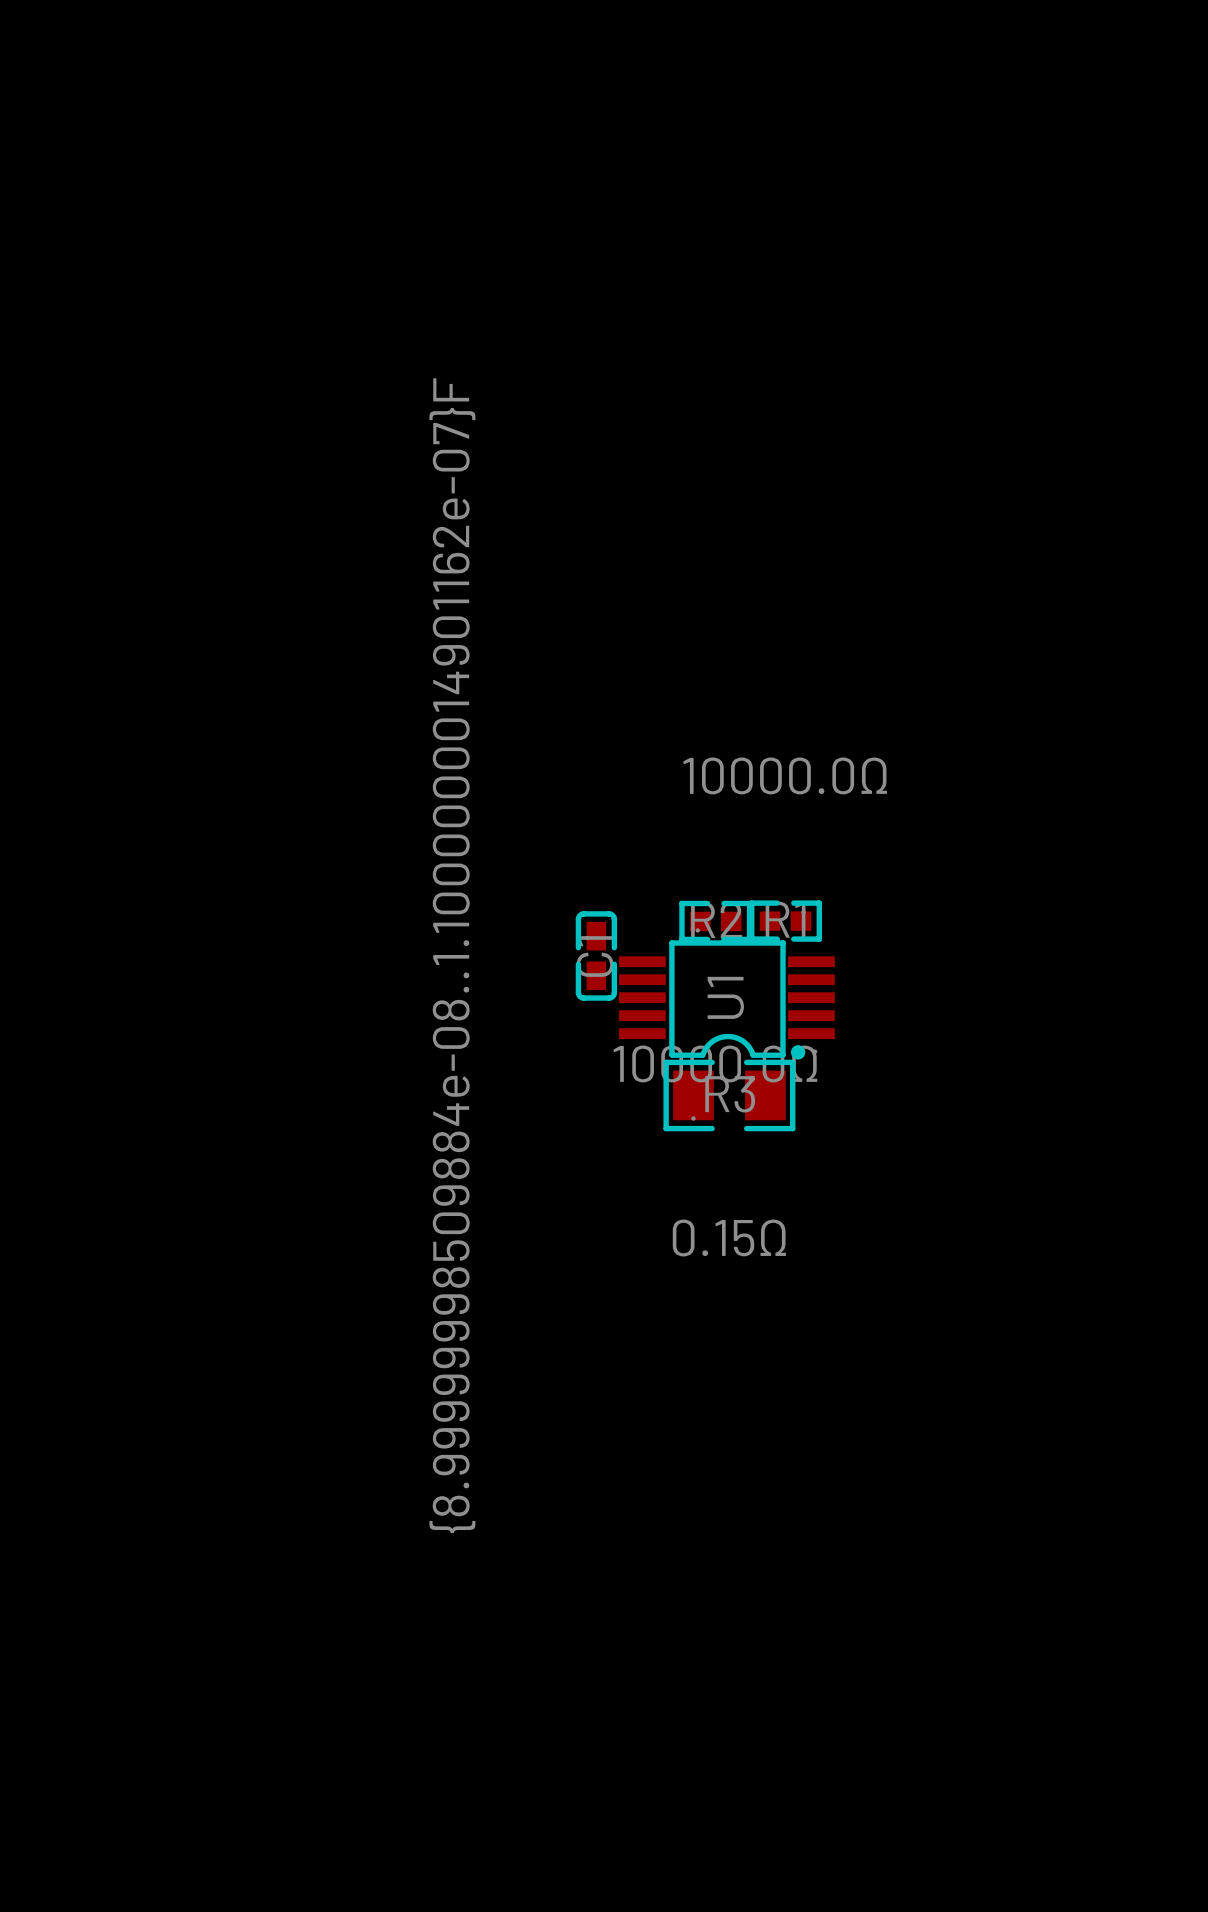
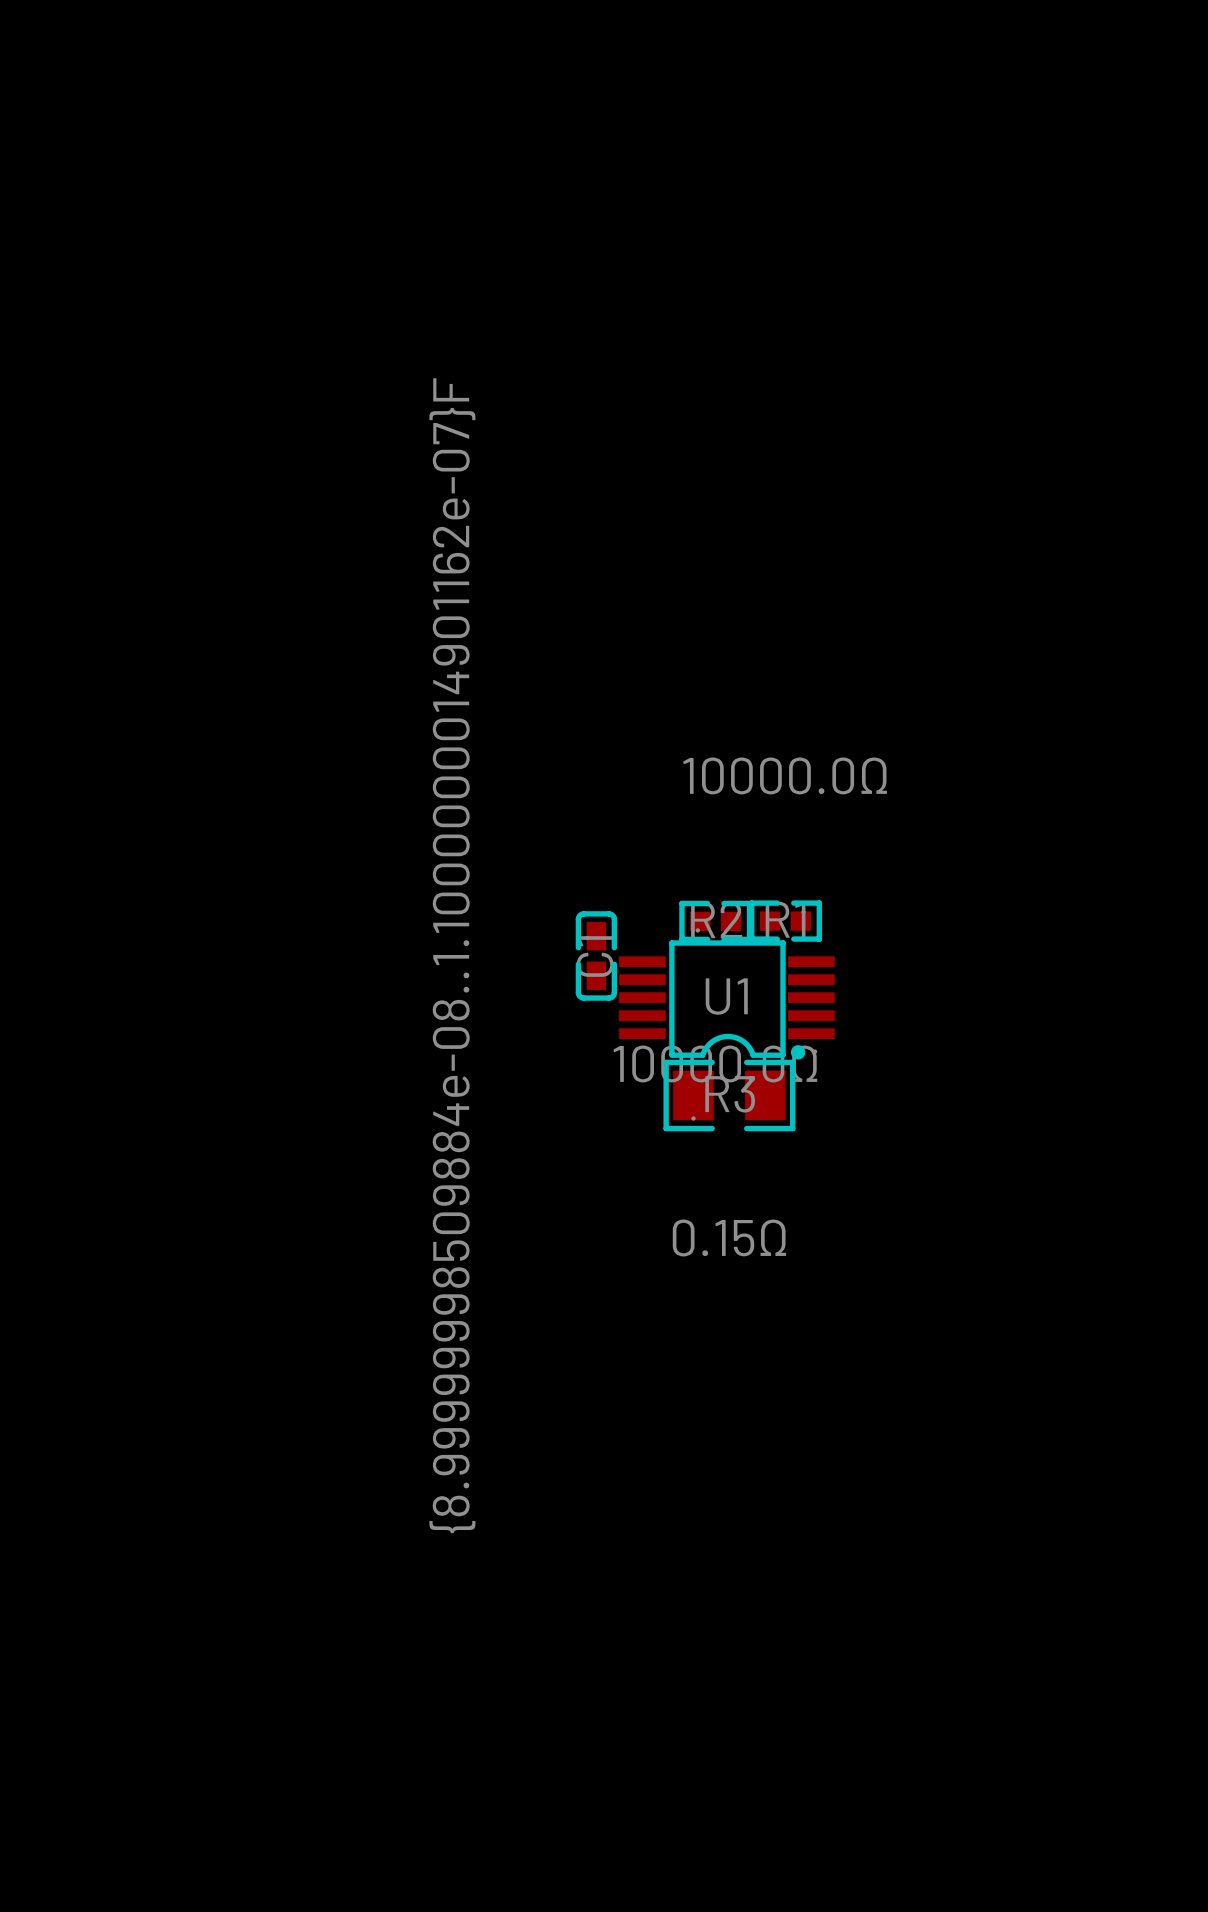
U1 name rotation: 0° (725, 997) -> 90° clockwise (726, 996)

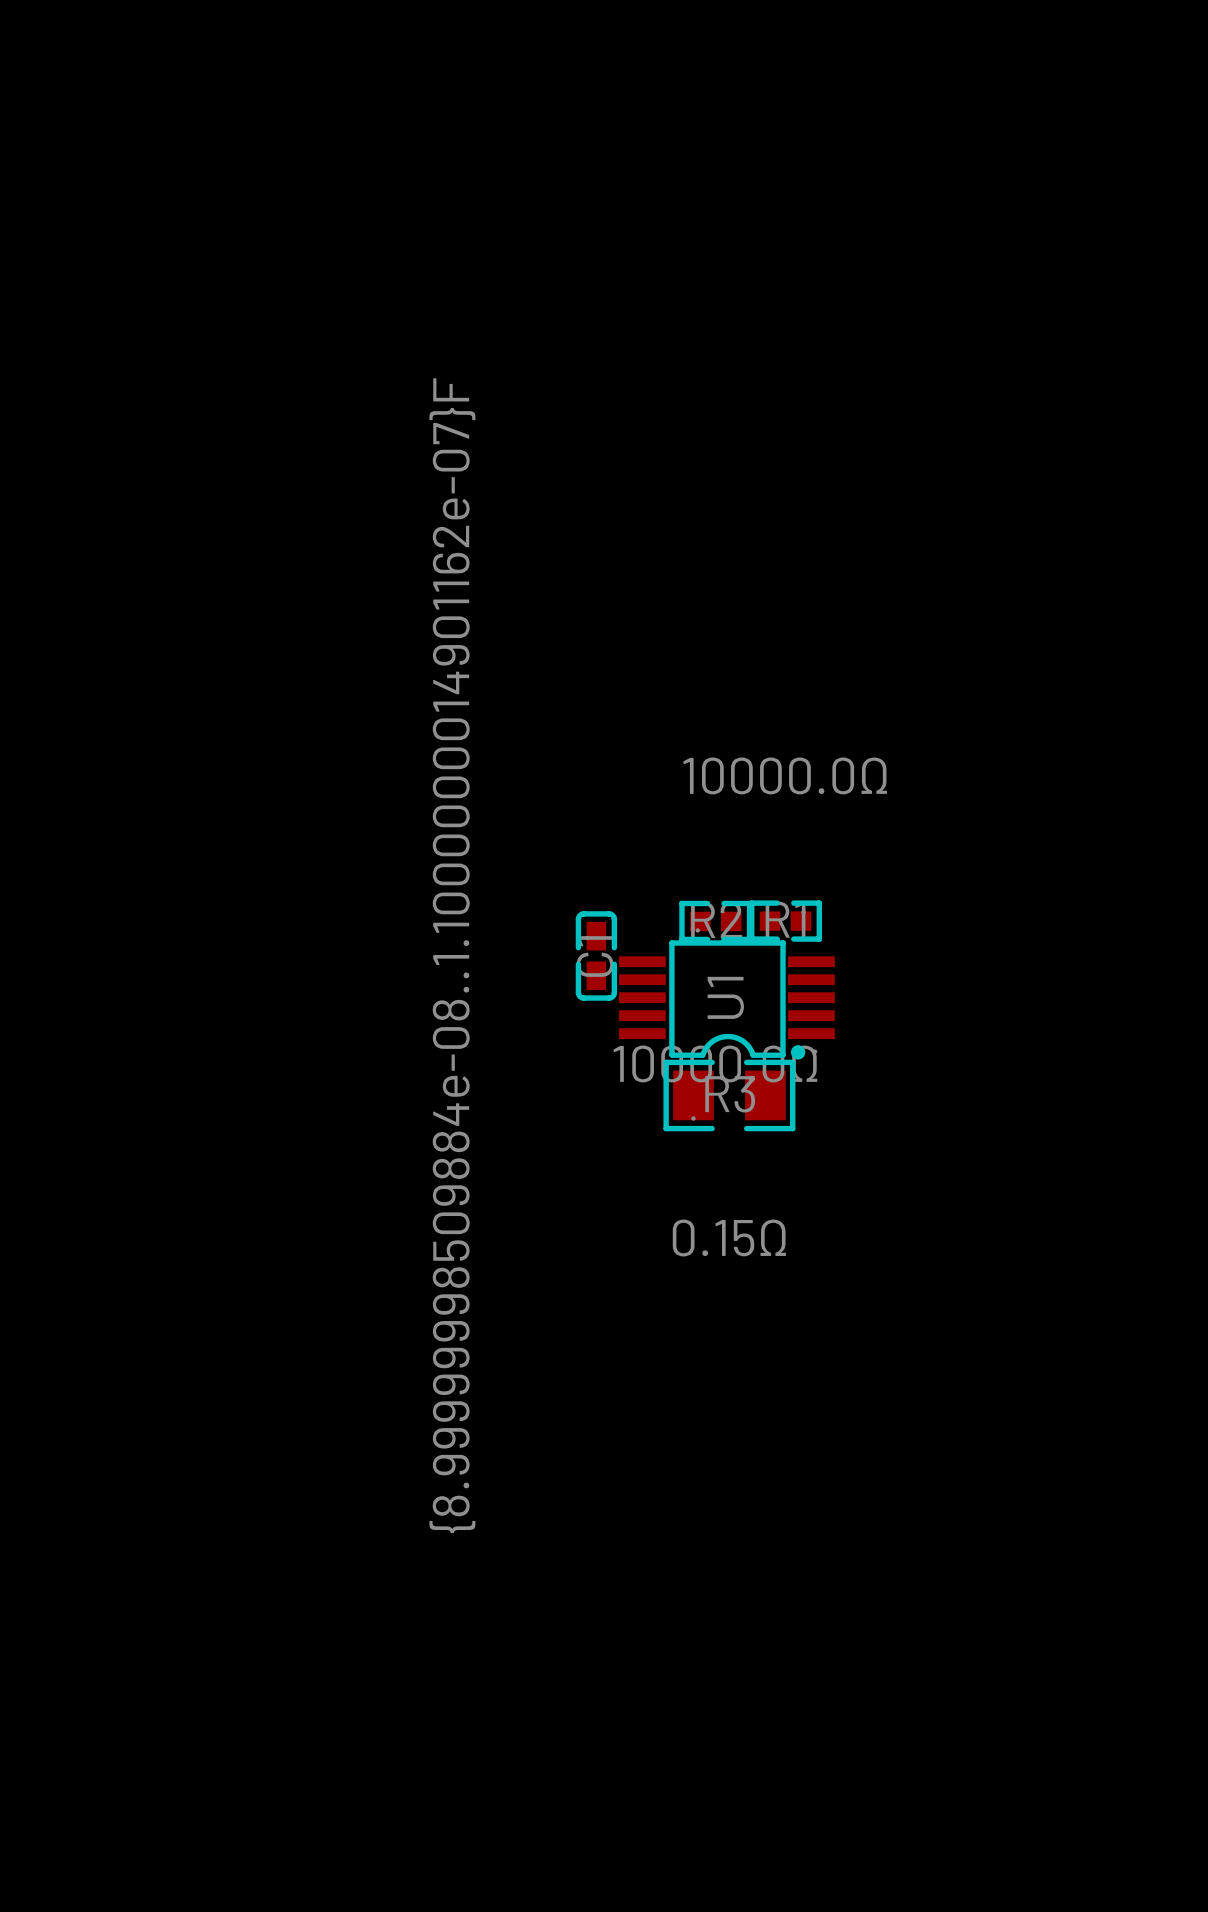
U1 name rotation: 0° (726, 996) -> 90° counterclockwise (725, 997)

